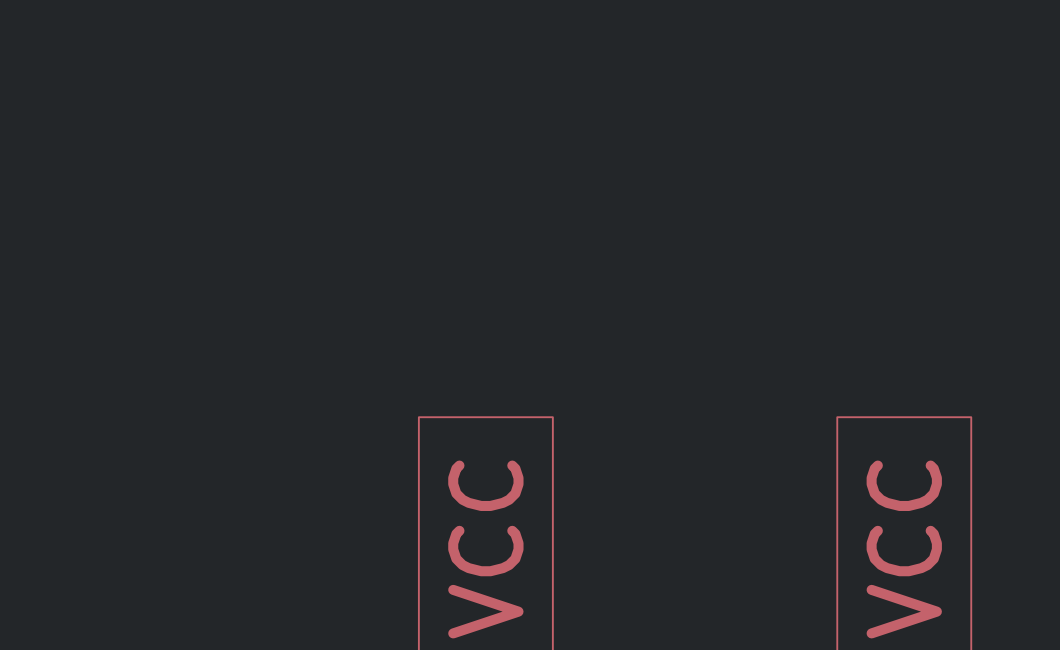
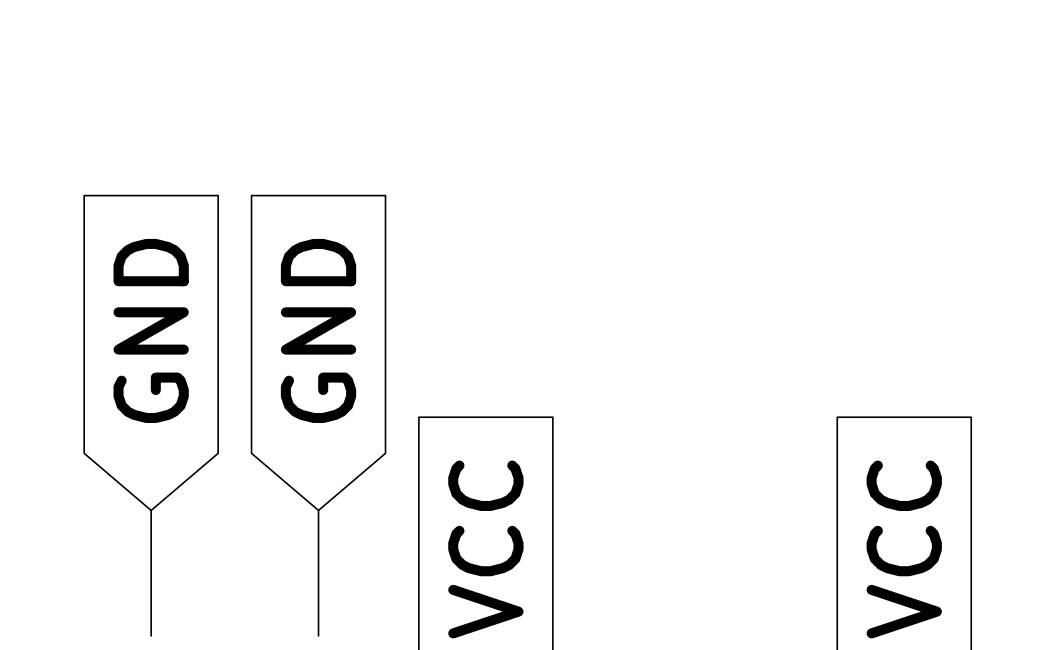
global label: none -> GND (151, 330)
global label: none -> GND (318, 330)
wire: none -> (151, 510) (151, 635)
wire: none -> (318, 510) (318, 635)

